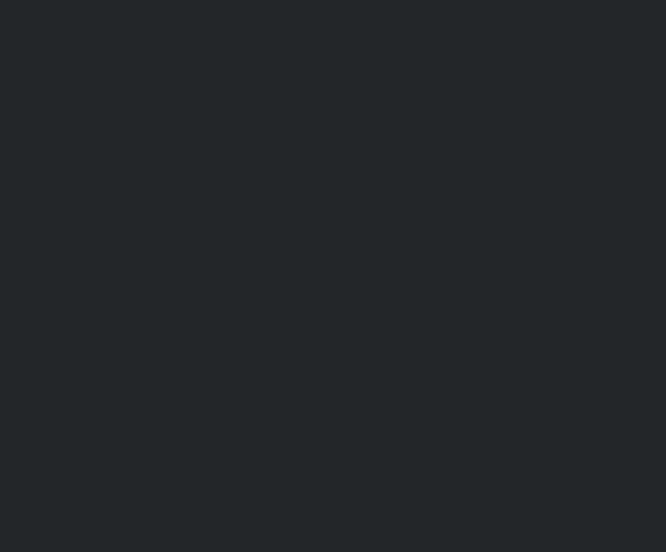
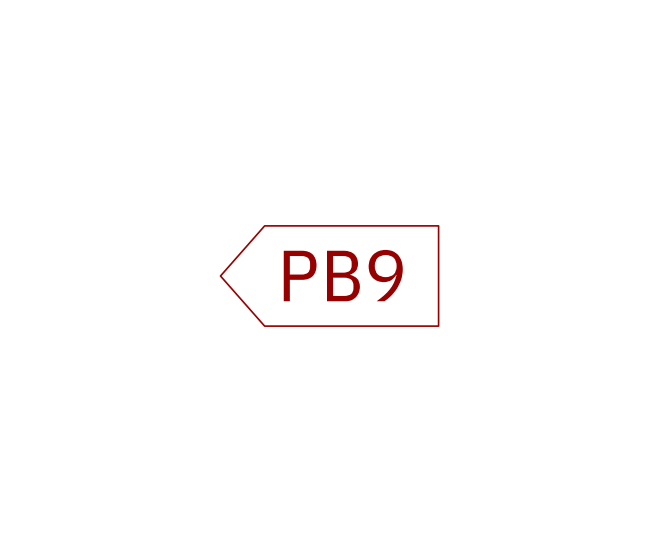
global label: none -> PB9 (343, 275)

